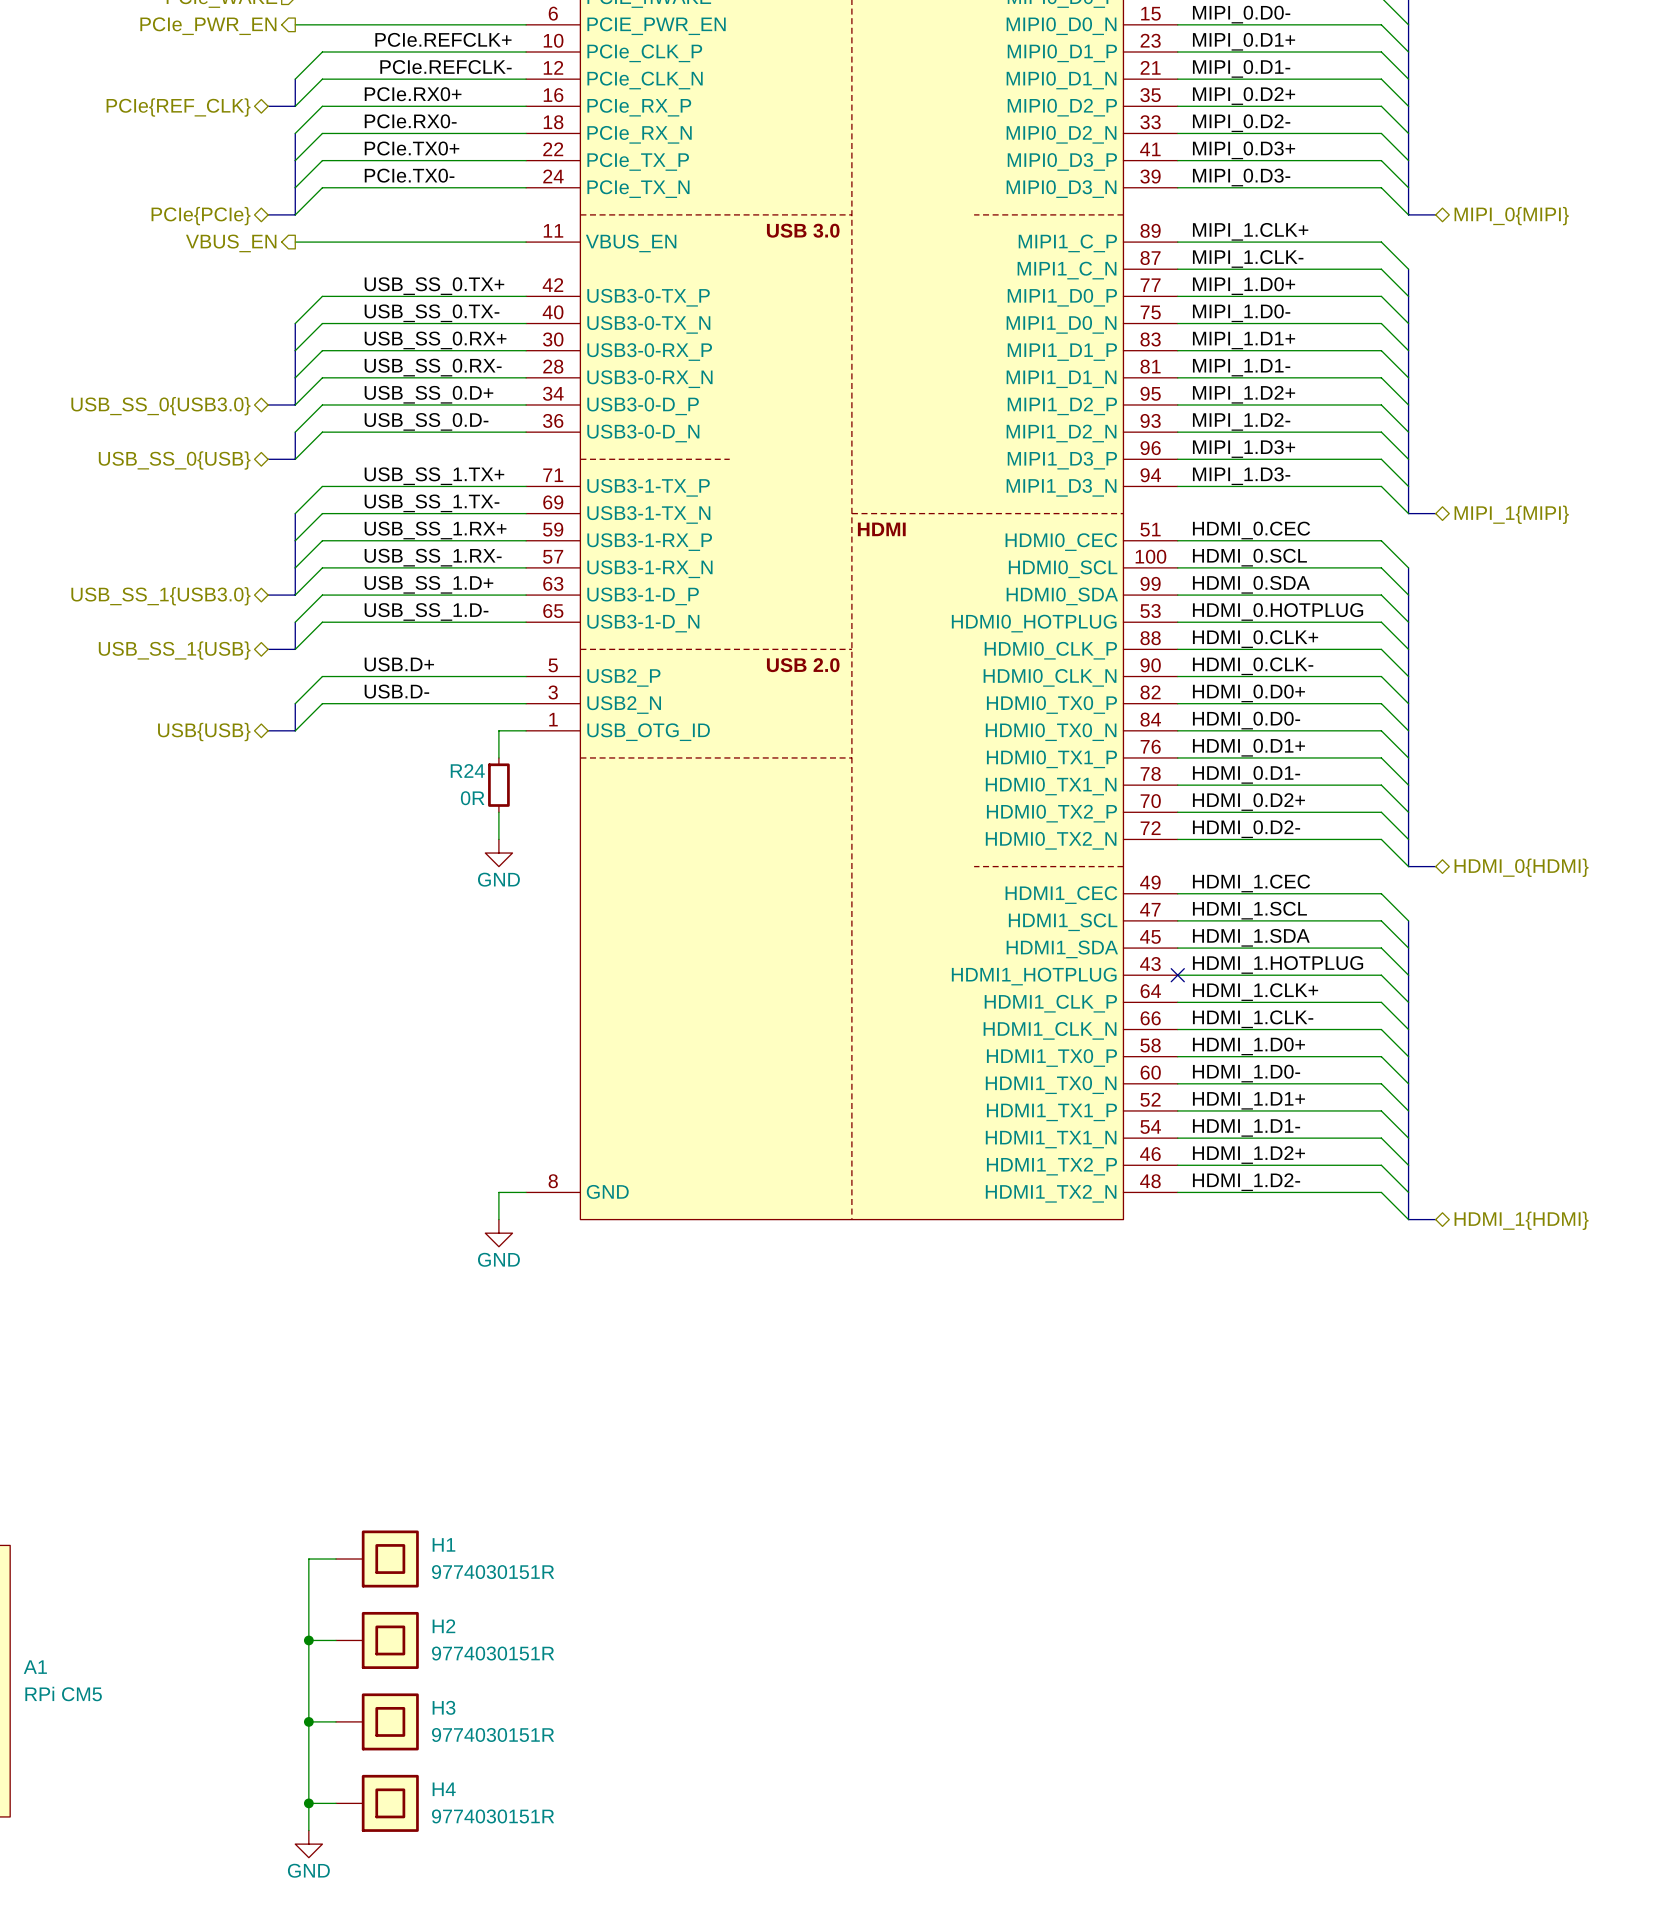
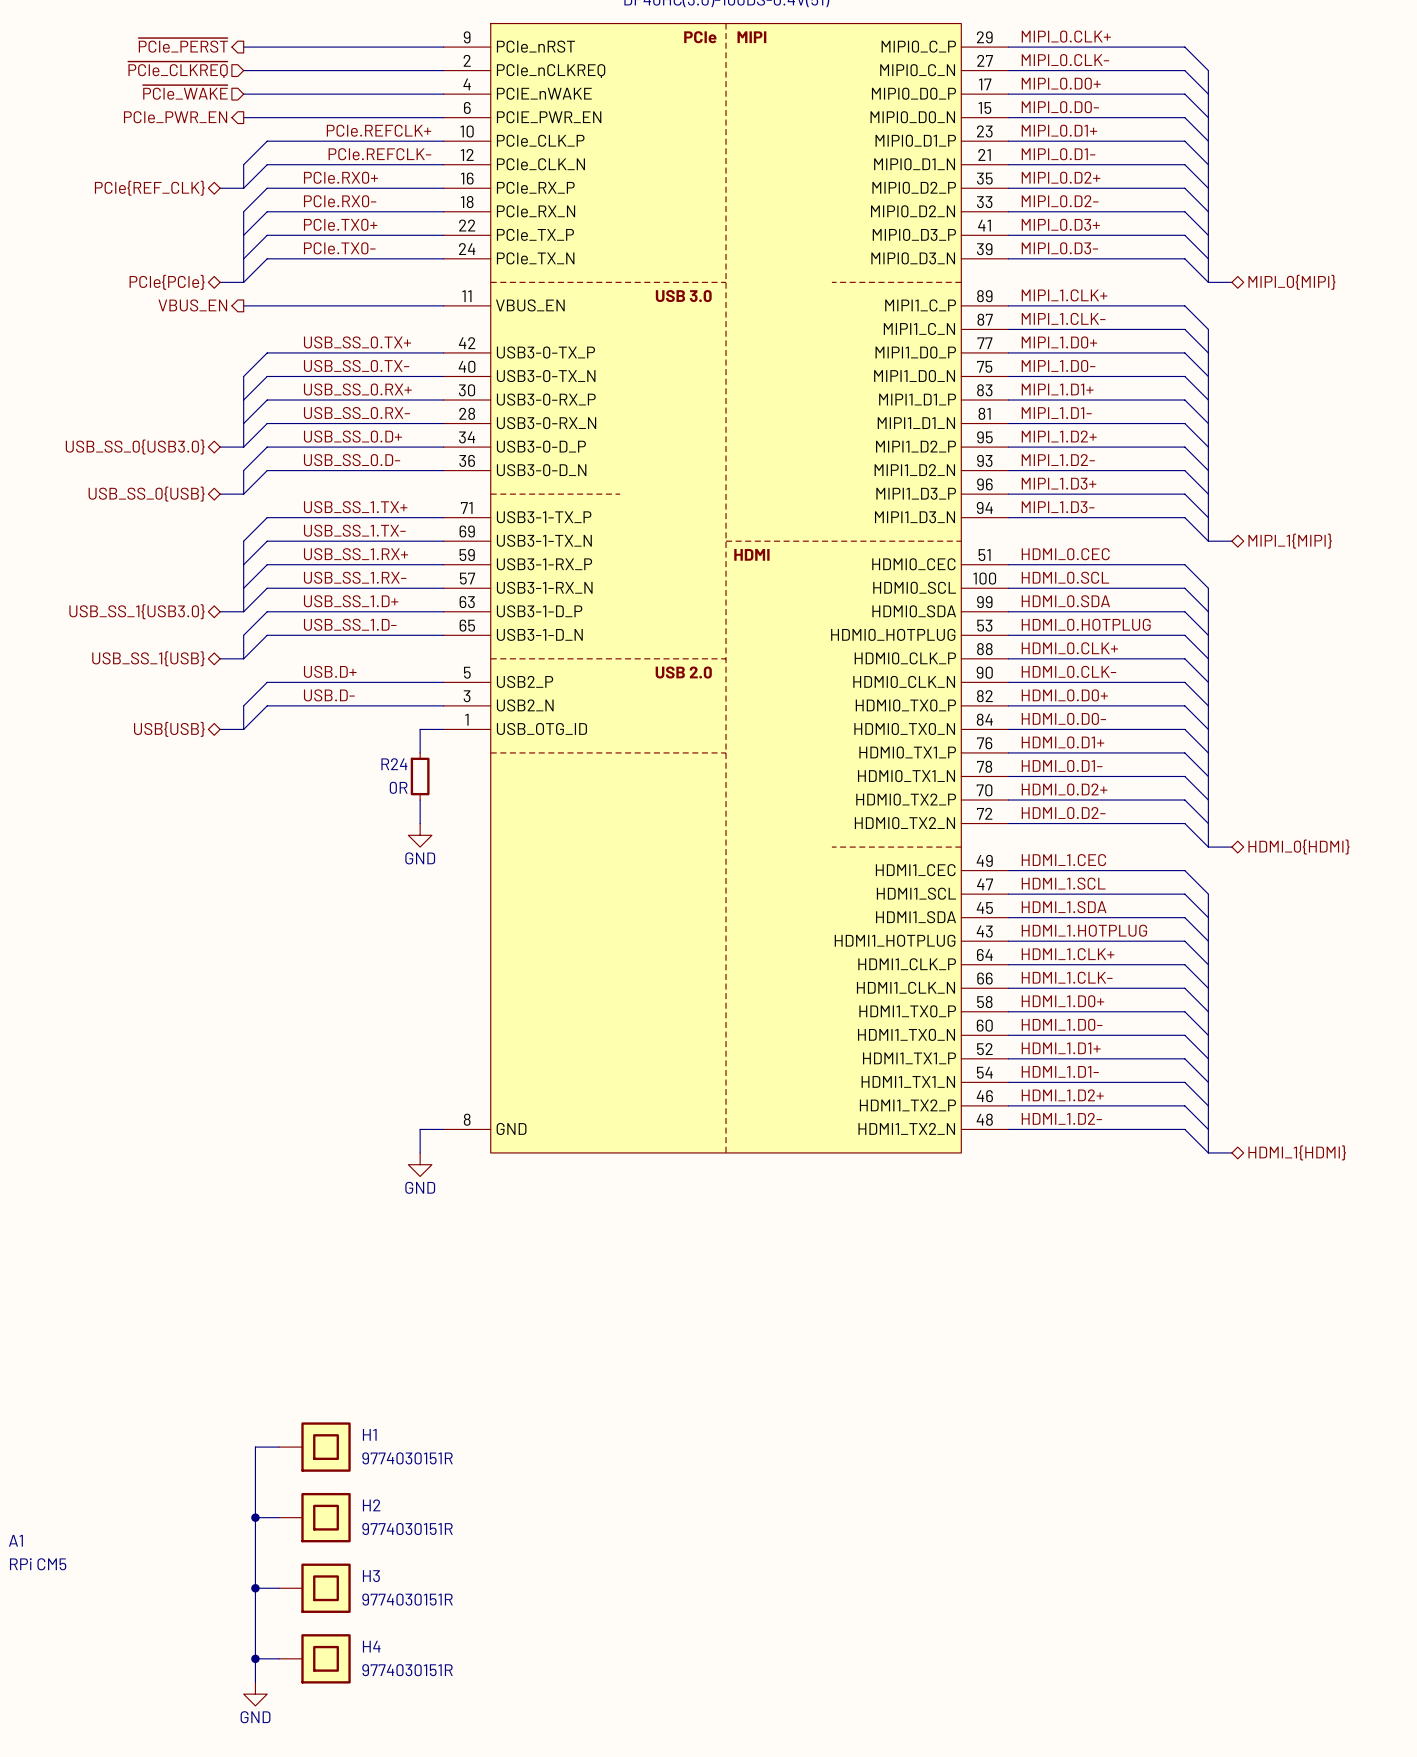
no-connect mark: (1177, 975) -> none

